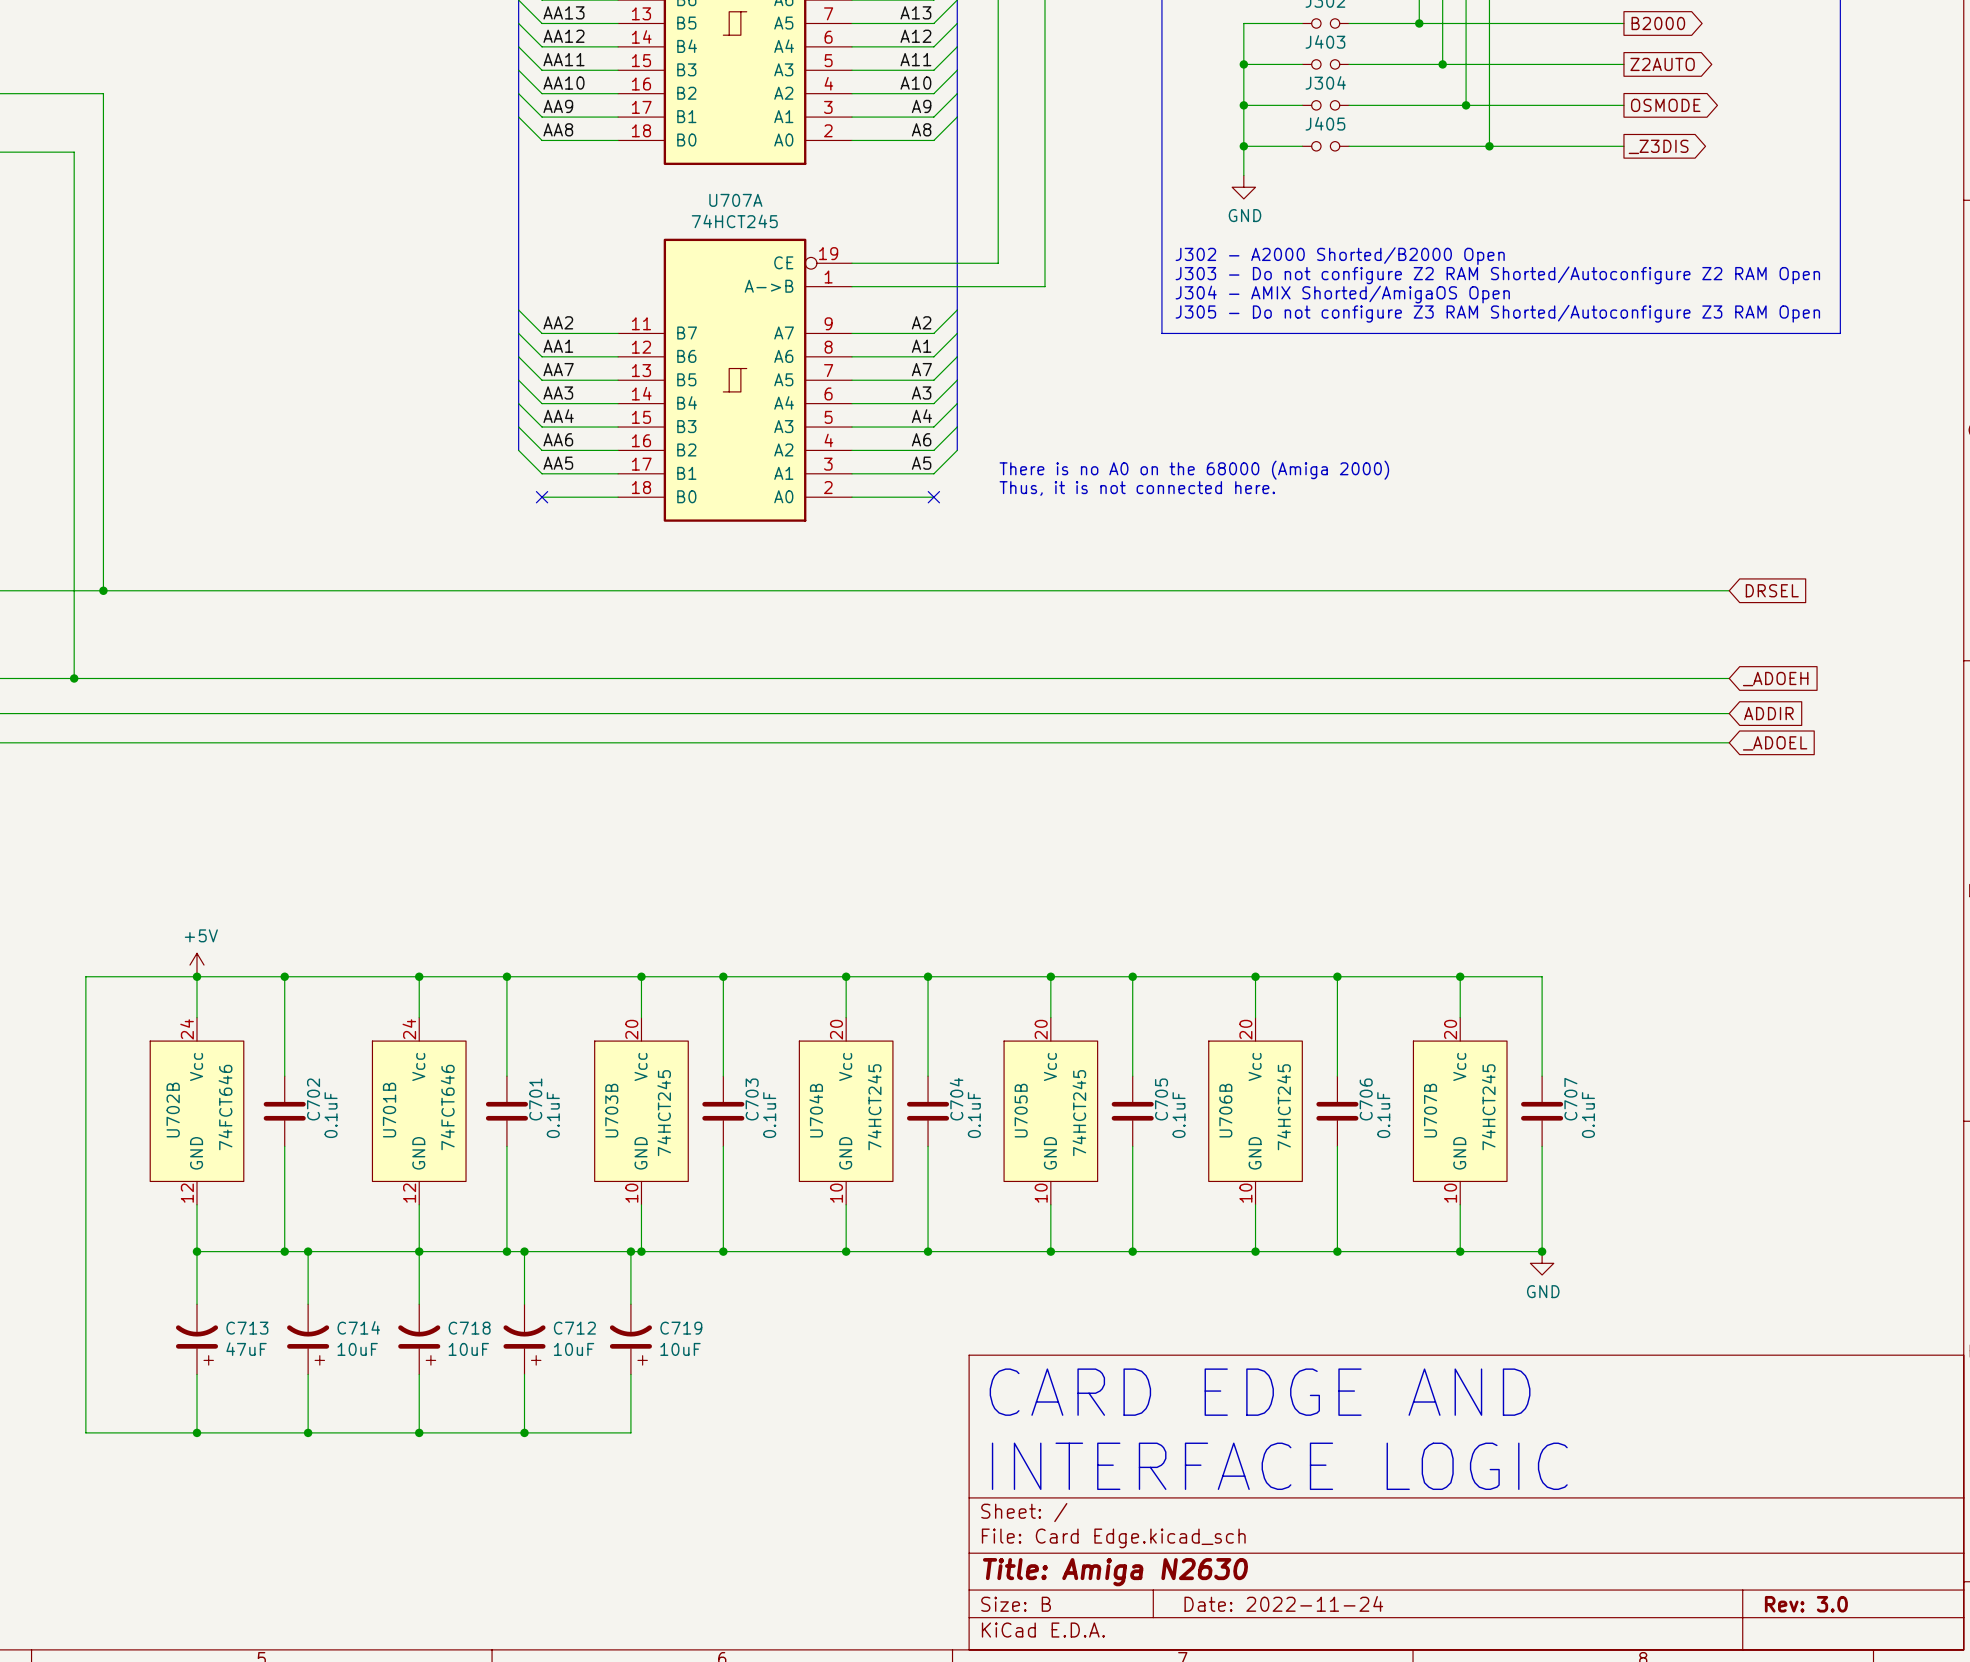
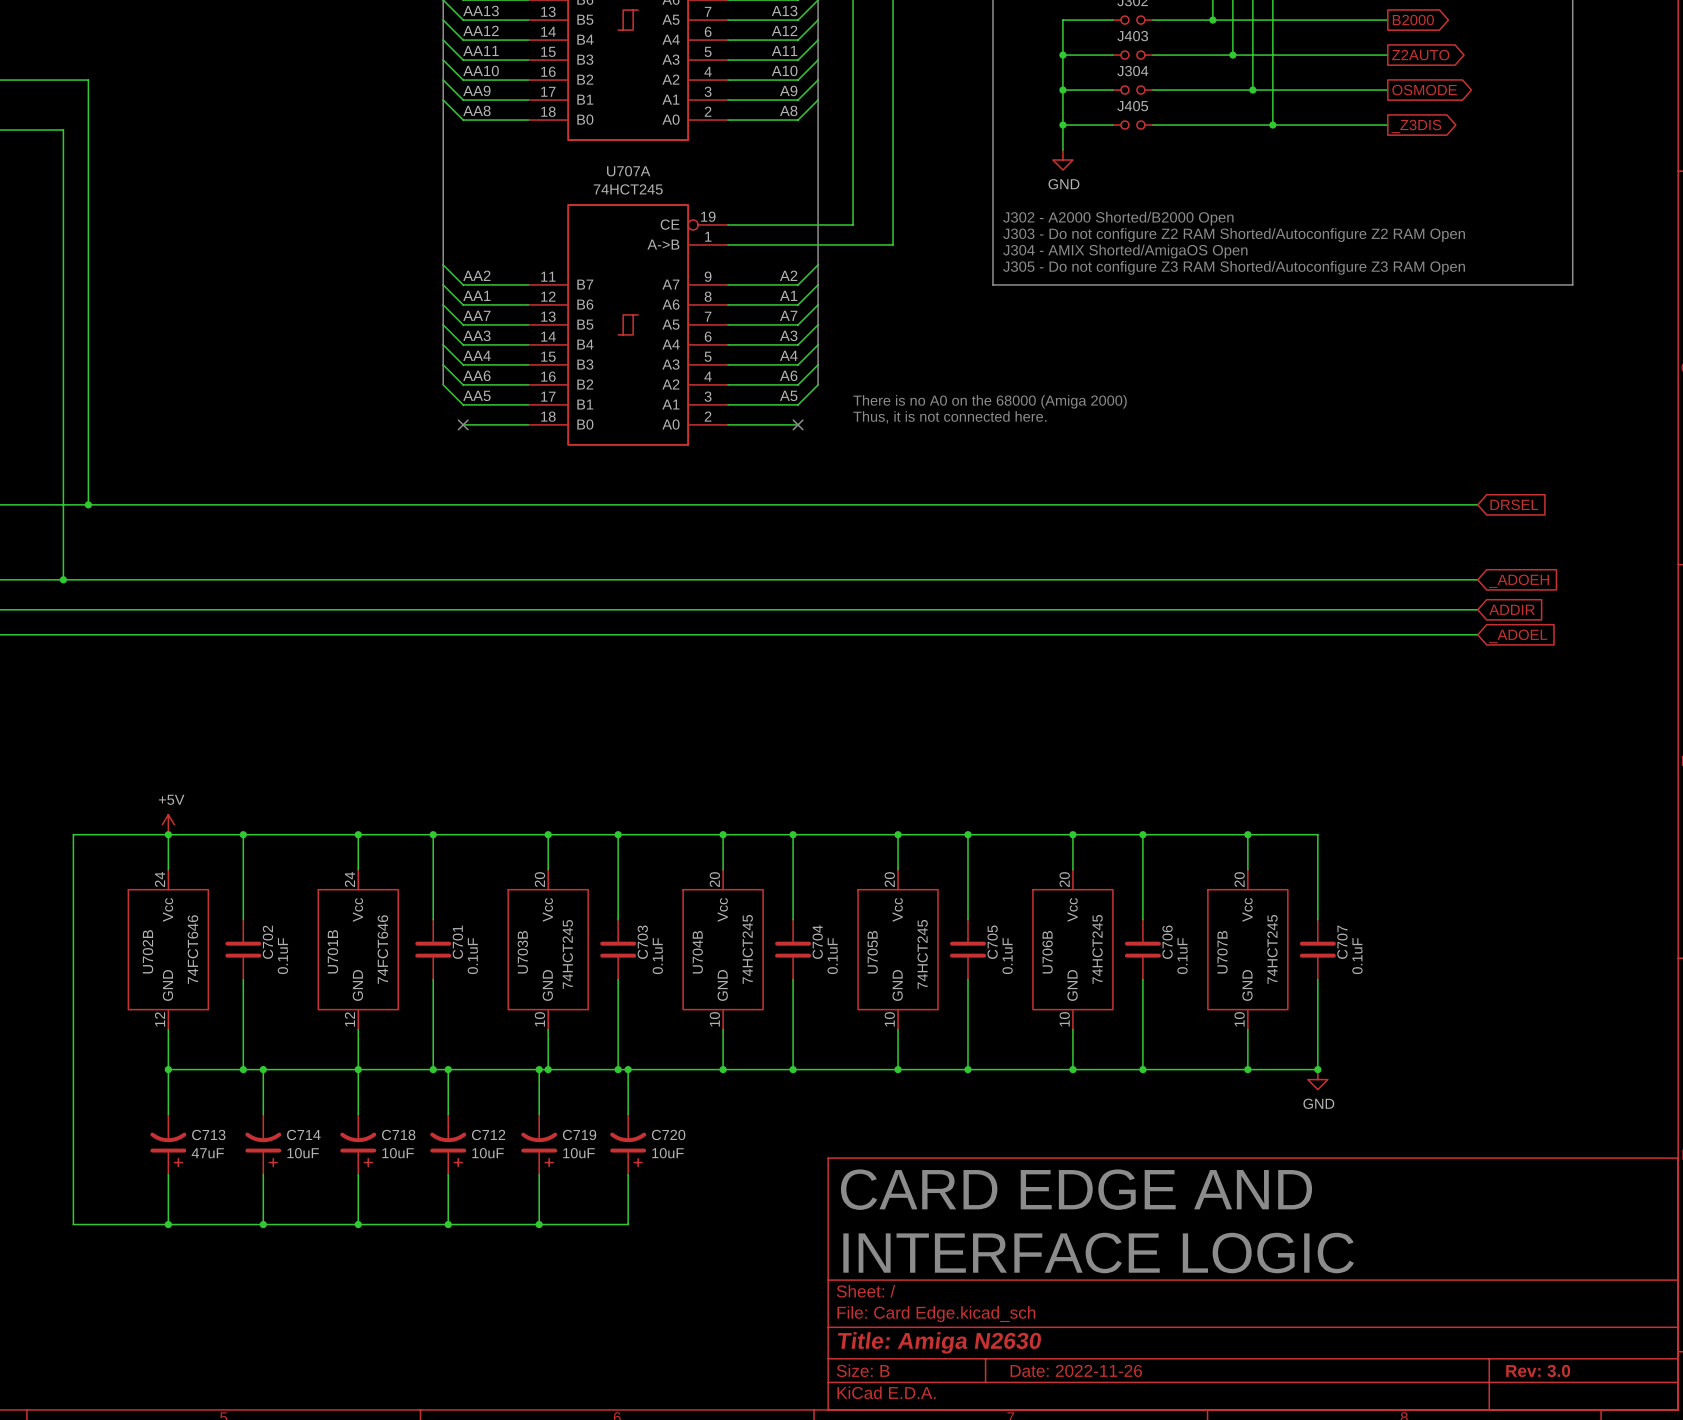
wire: none -> (628, 1069) (628, 1114)
junction: none -> (628, 1069)
C720: none -> 10uF (628, 1144)
wire: none -> (628, 1174) (628, 1224) (539, 1224)
junction: none -> (539, 1224)
title block: Date: 2022-11-24 (1283, 1603) -> Date: 2022-11-26 (1076, 1370)

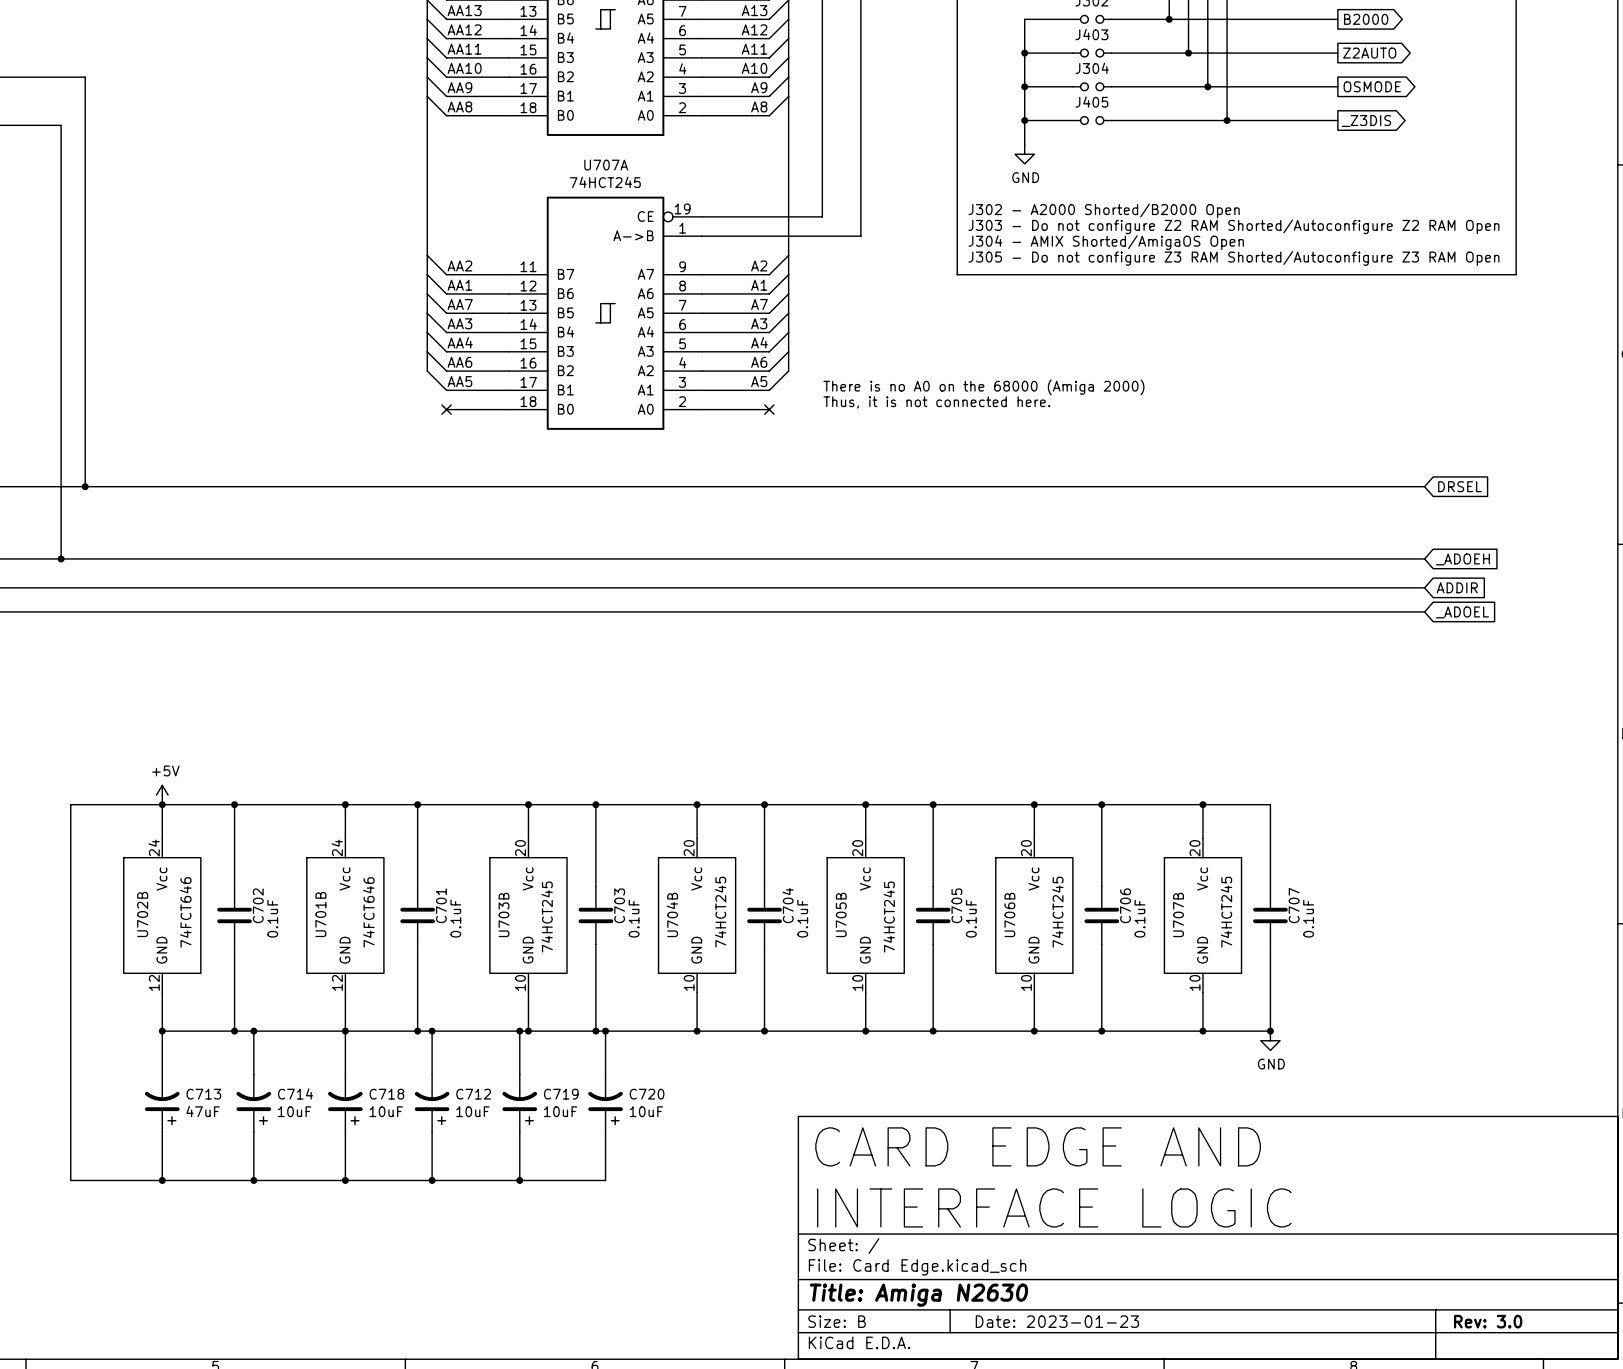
title block: Date: 2022-11-26 (1076, 1370) -> Date: 2023-01-23 (1057, 1321)

